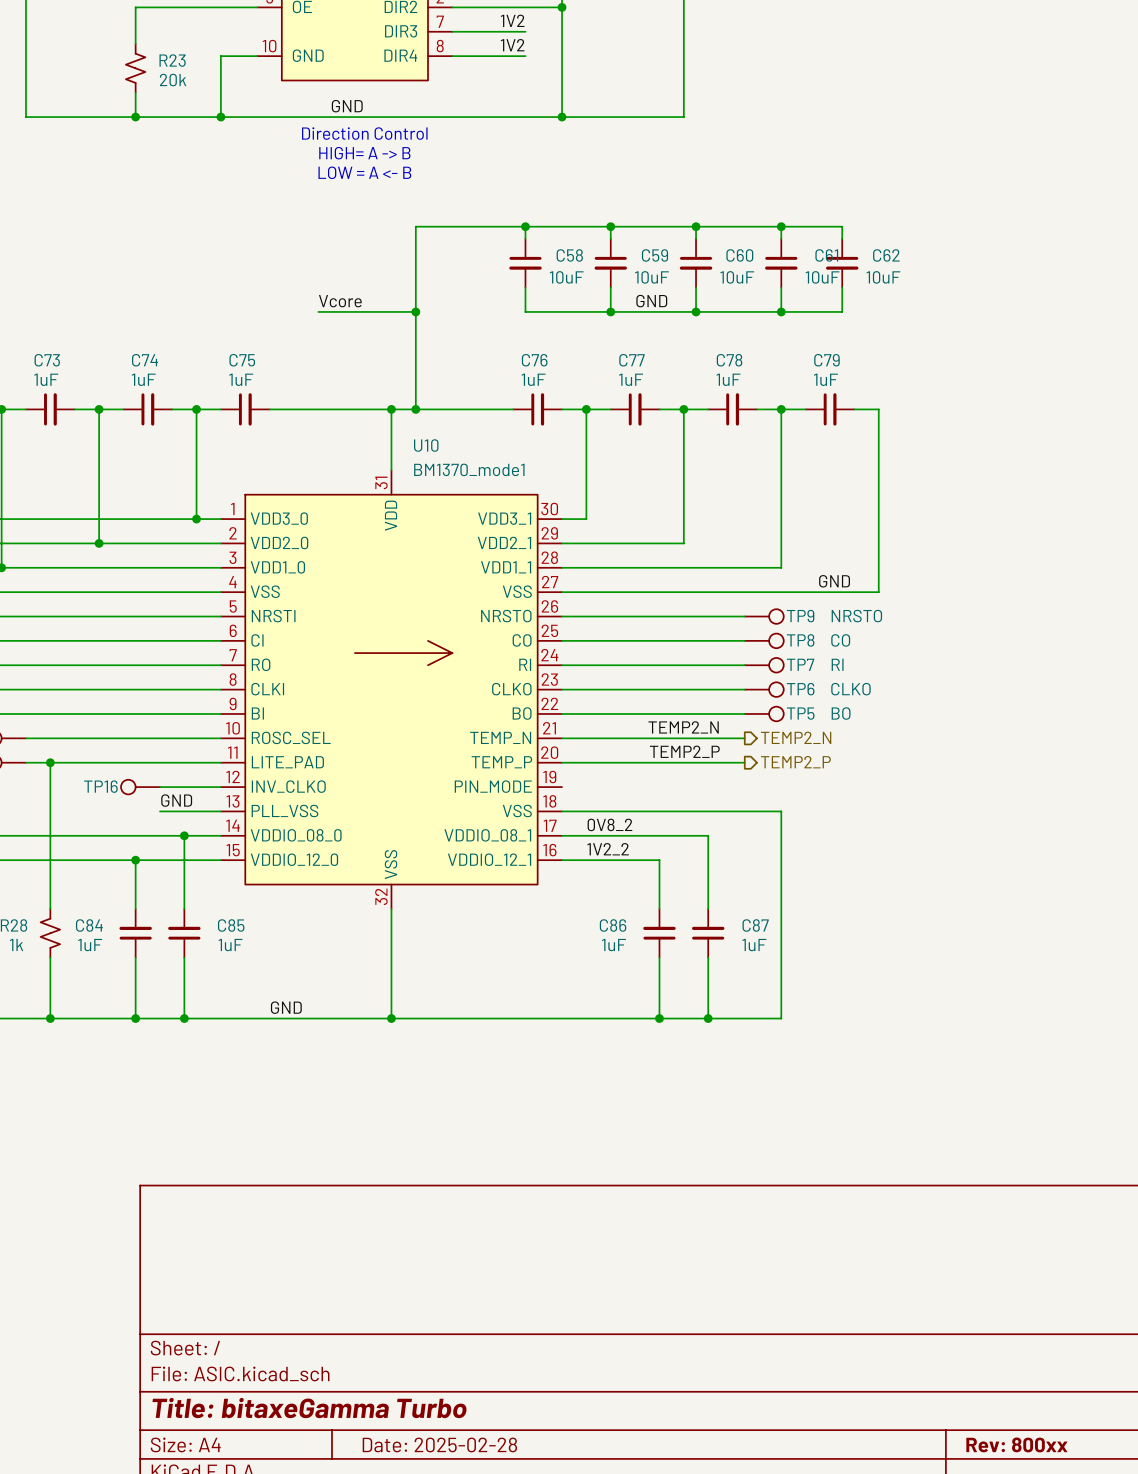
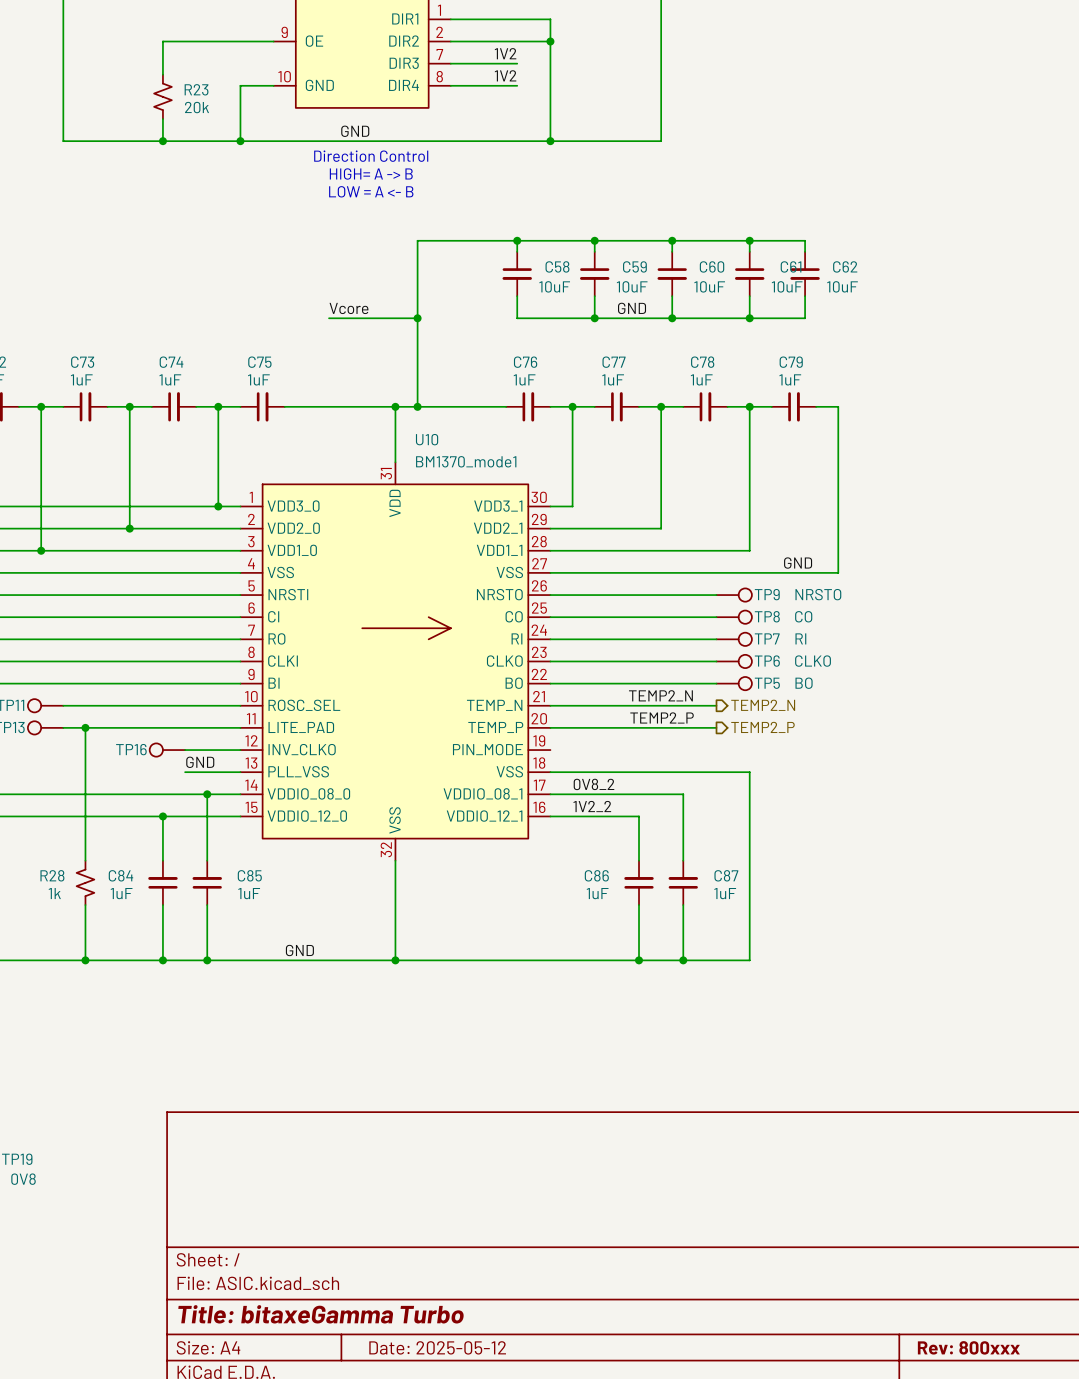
title block: Date: 2025-02-28 (439, 1444) -> Date: 2025-05-12 (437, 1347)
title block: Rev: 800xx (1016, 1444) -> Rev: 800xxx (968, 1347)

